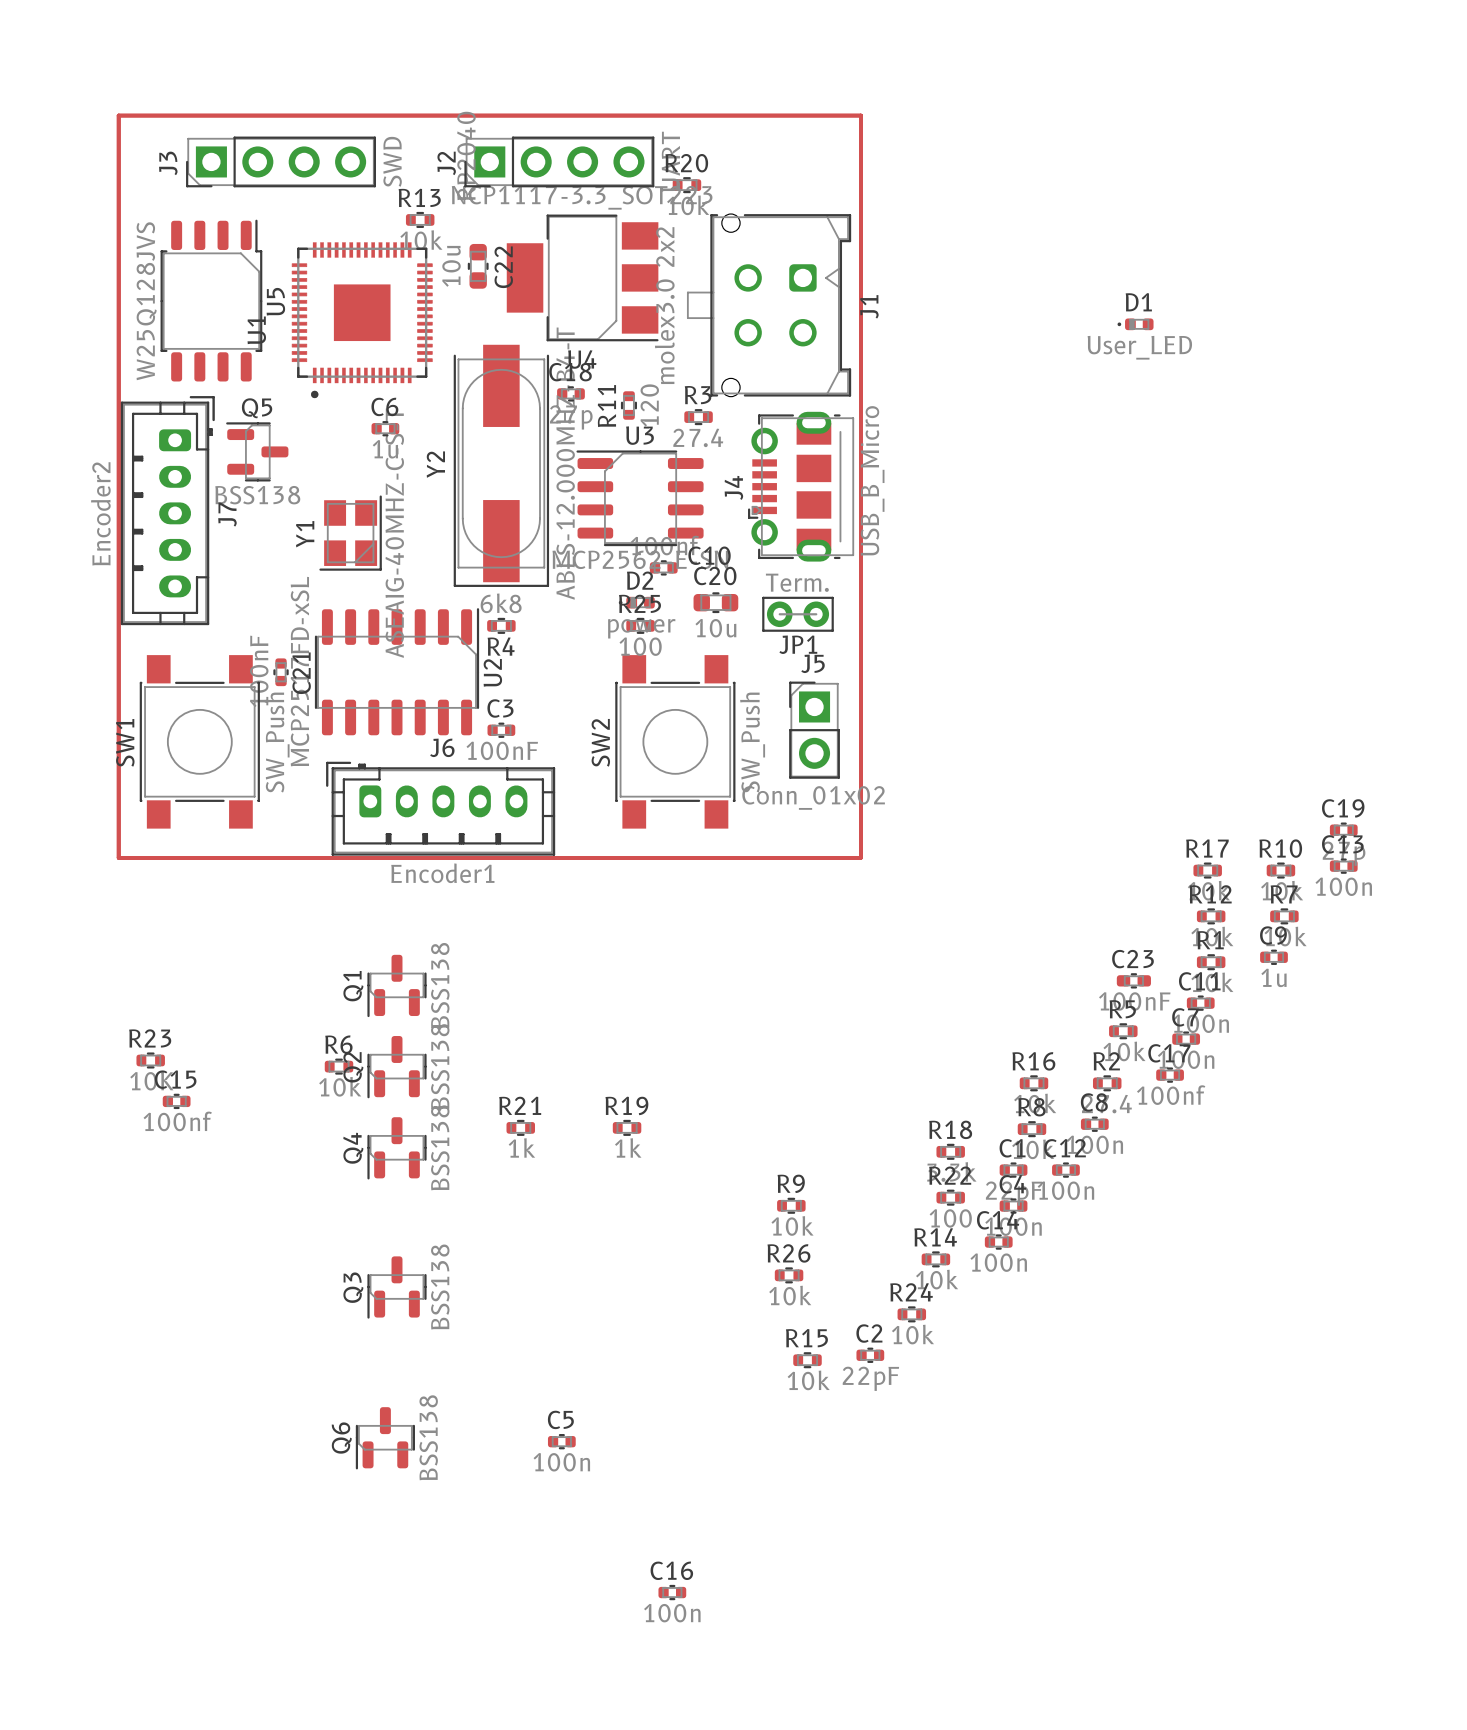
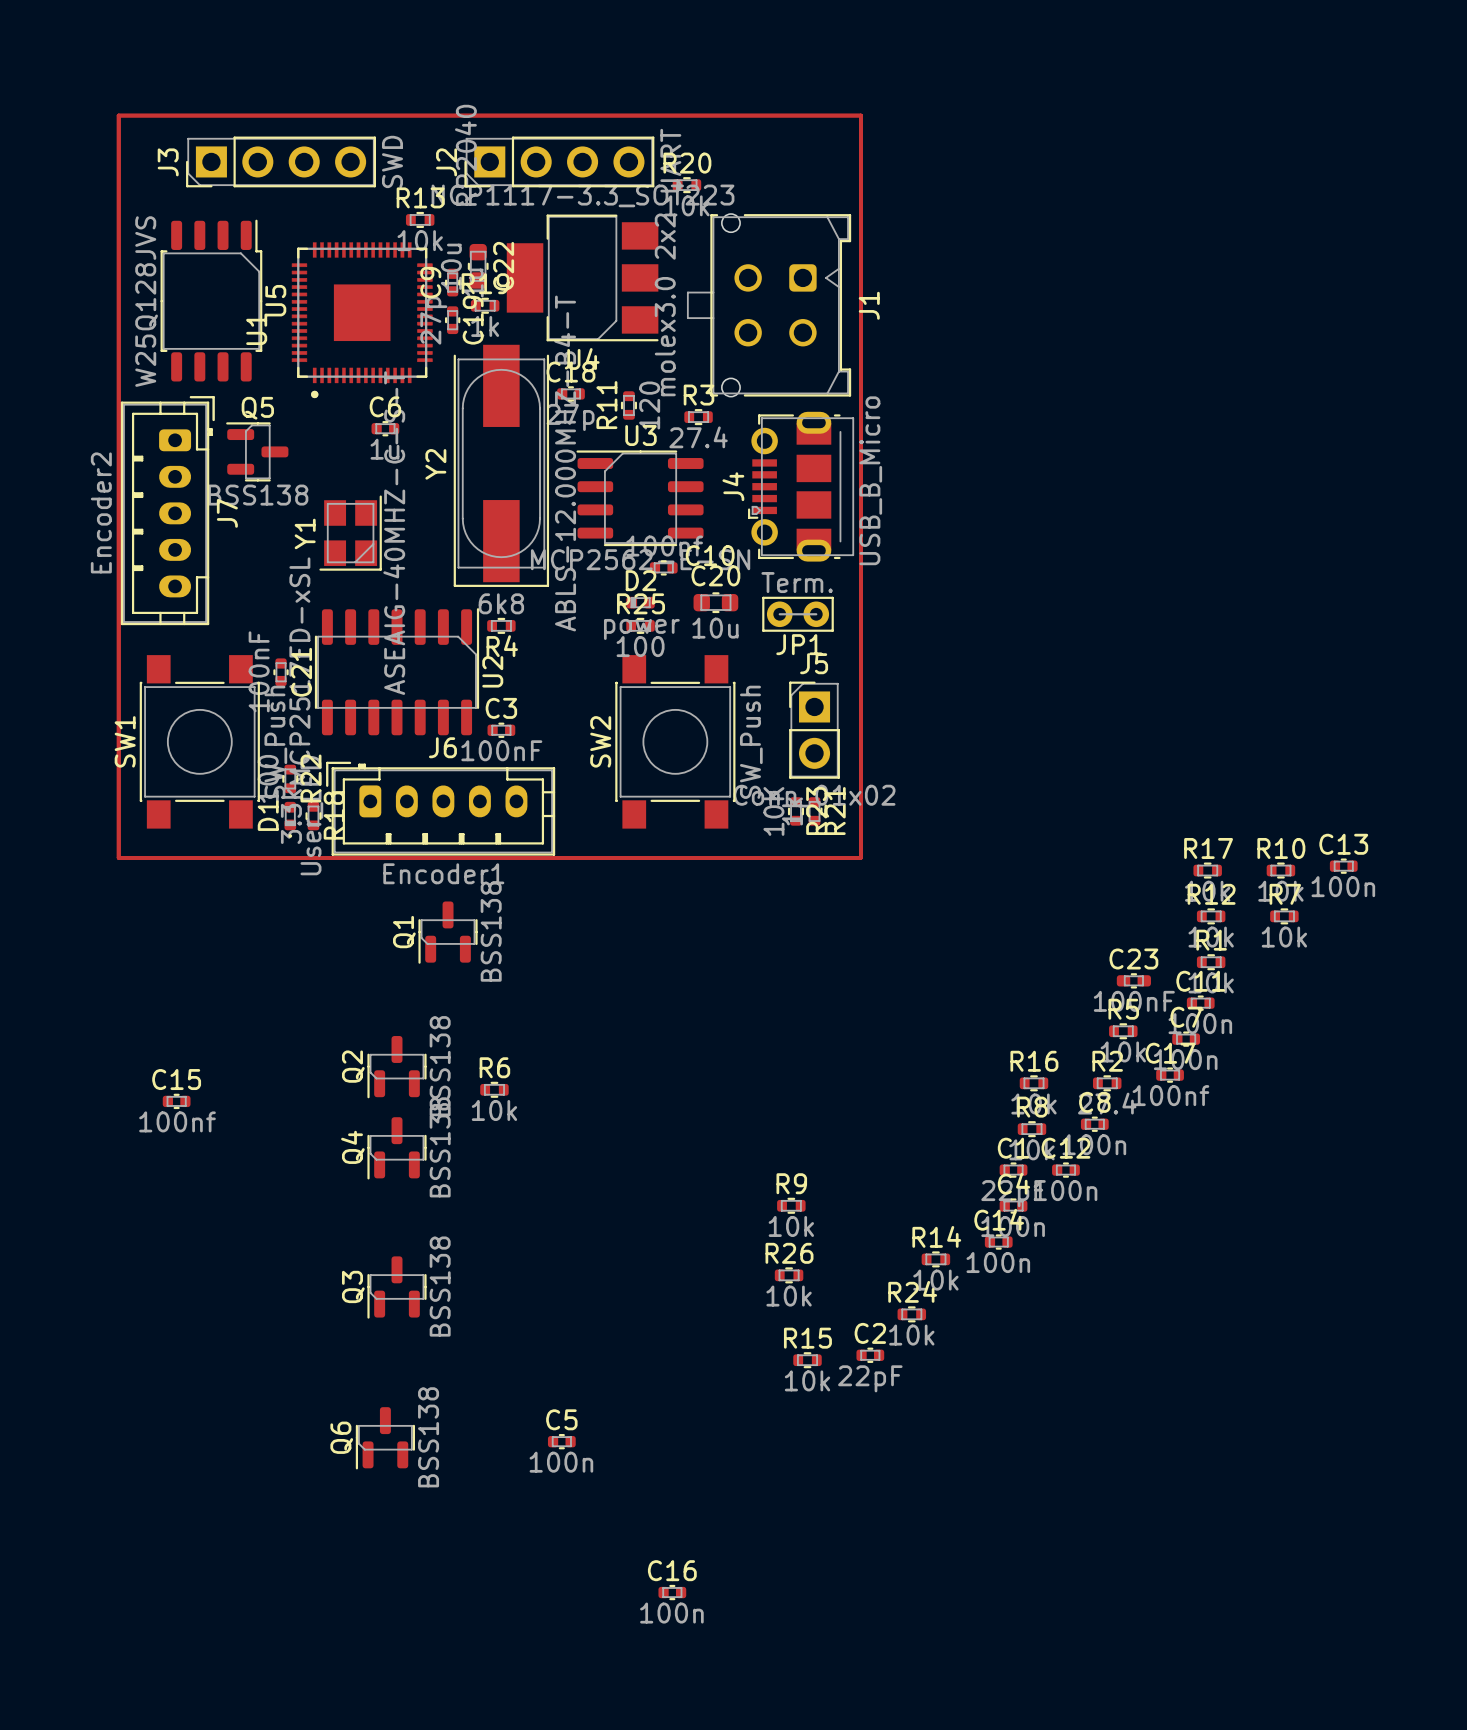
D1 rotation: 0° (1135, 324) -> 90° counterclockwise (290, 819)
D1 position: (1135, 324) -> (290, 819)
C19 rotation: 0° (1343, 830) -> 90° clockwise (452, 320)
C19 position: (1343, 830) -> (452, 320)
C9 rotation: 0° (1273, 957) -> 90° clockwise (452, 282)
C9 position: (1273, 957) -> (452, 282)
Q1 position: (397, 985) -> (448, 932)
R23 rotation: 0° (150, 1060) -> 90° clockwise (795, 811)
R23 position: (150, 1060) -> (795, 811)
R6 position: (339, 1066) -> (494, 1089)
R21 rotation: 0° (520, 1127) -> 90° clockwise (814, 811)
R21 position: (520, 1127) -> (814, 811)
R19 position: (627, 1127) -> (485, 305)
R18 rotation: 0° (950, 1151) -> 90° clockwise (313, 816)
R18 position: (950, 1151) -> (313, 816)
R22 rotation: 0° (950, 1197) -> 90° clockwise (290, 778)
R22 position: (950, 1197) -> (290, 778)

